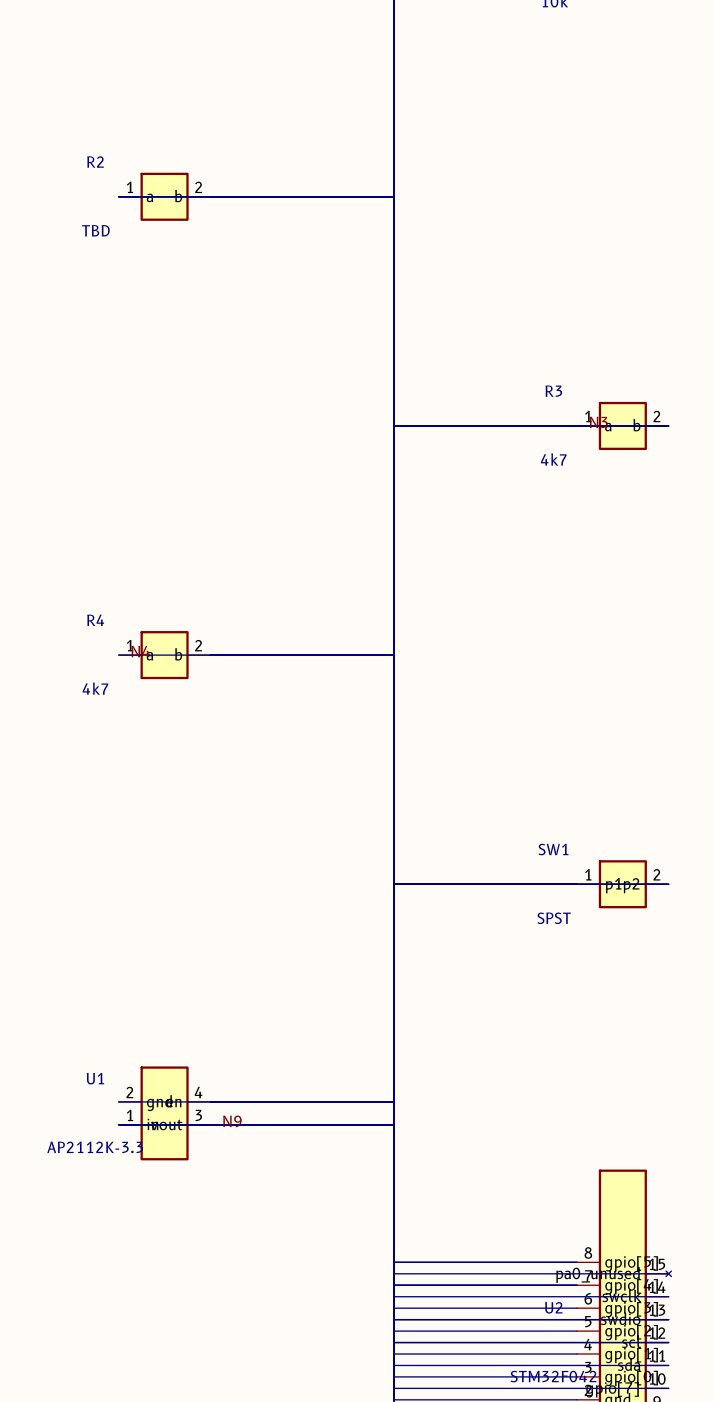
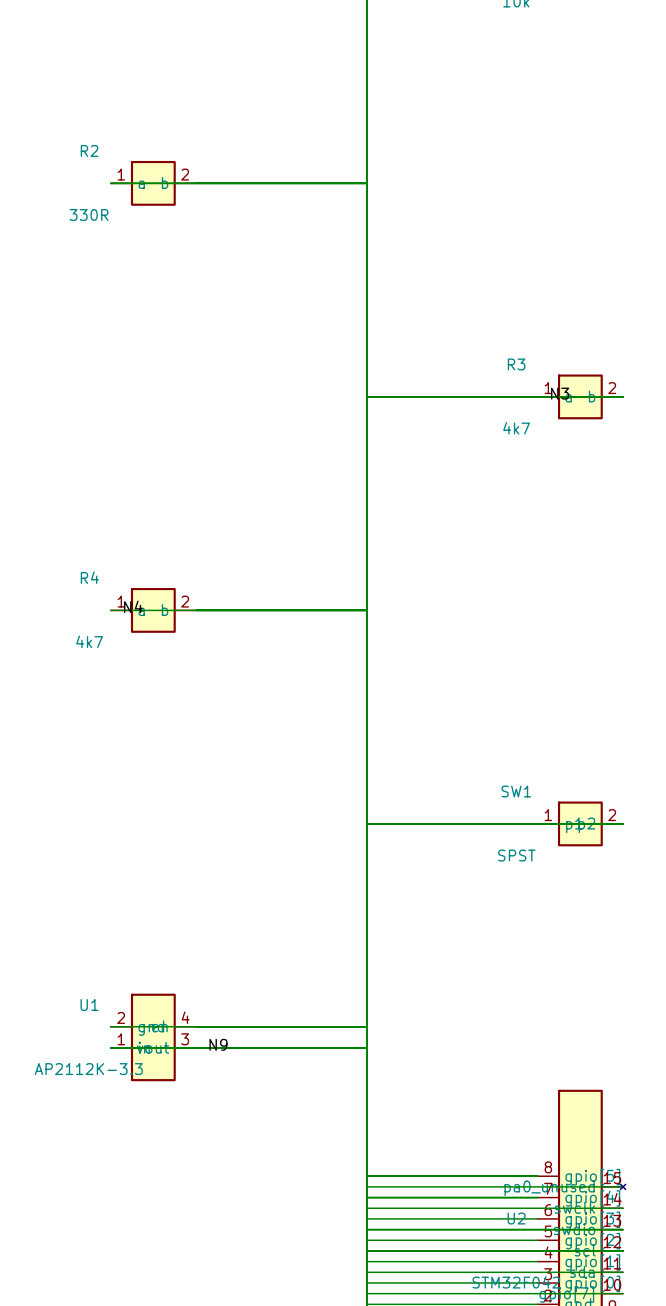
R2 value: TBD (95, 230) -> 330R (89, 215)

